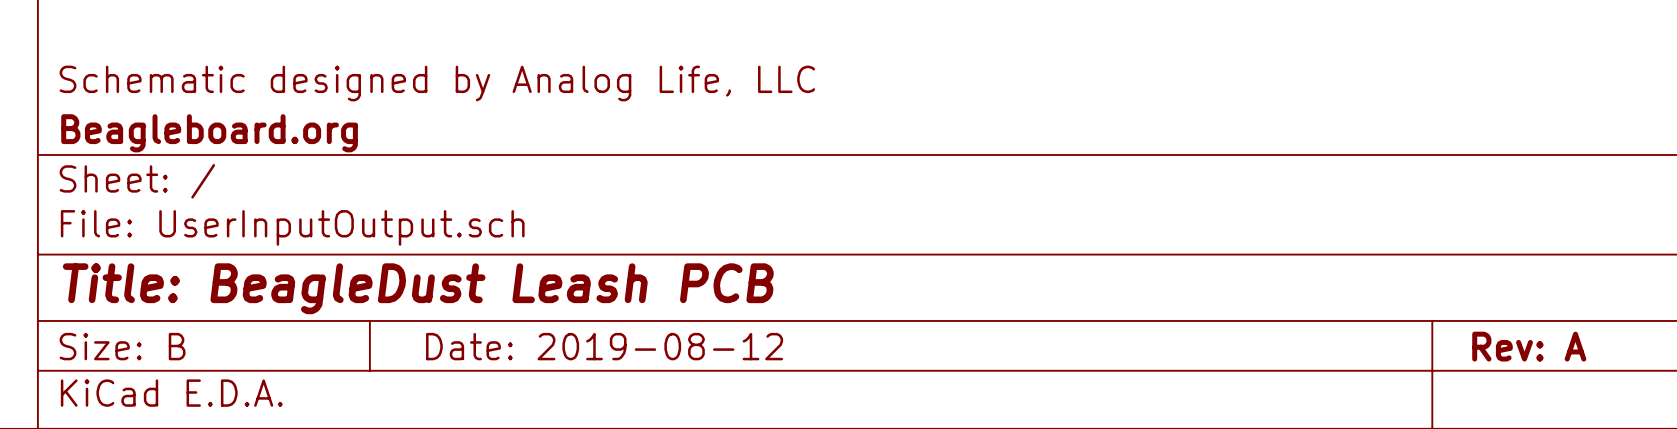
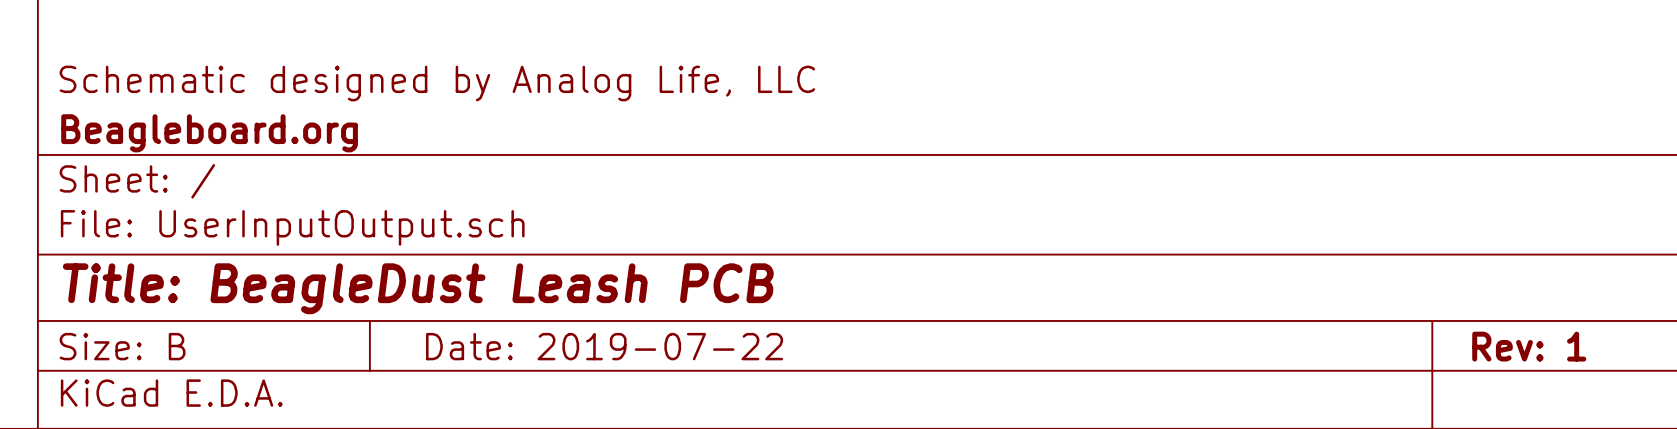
title block: Date: 2019-08-12 (604, 346) -> Date: 2019-07-22 (604, 346)
title block: Rev: A (1529, 346) -> Rev: 1 (1529, 346)

